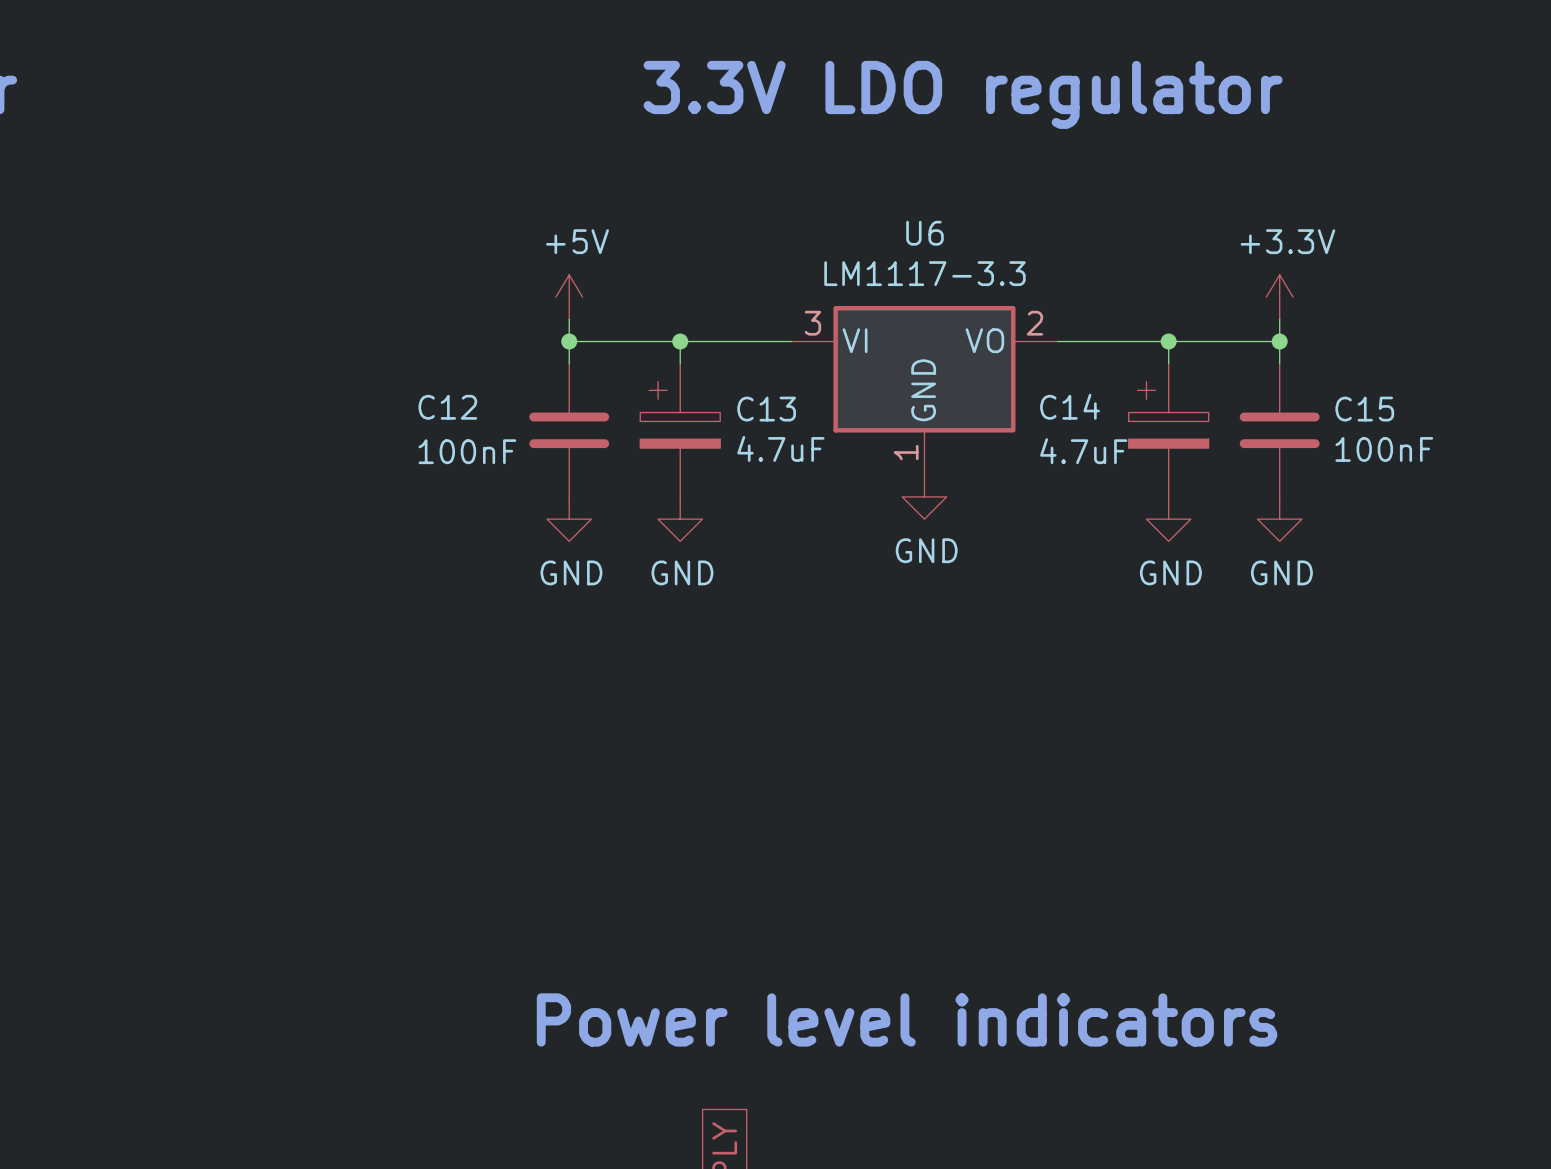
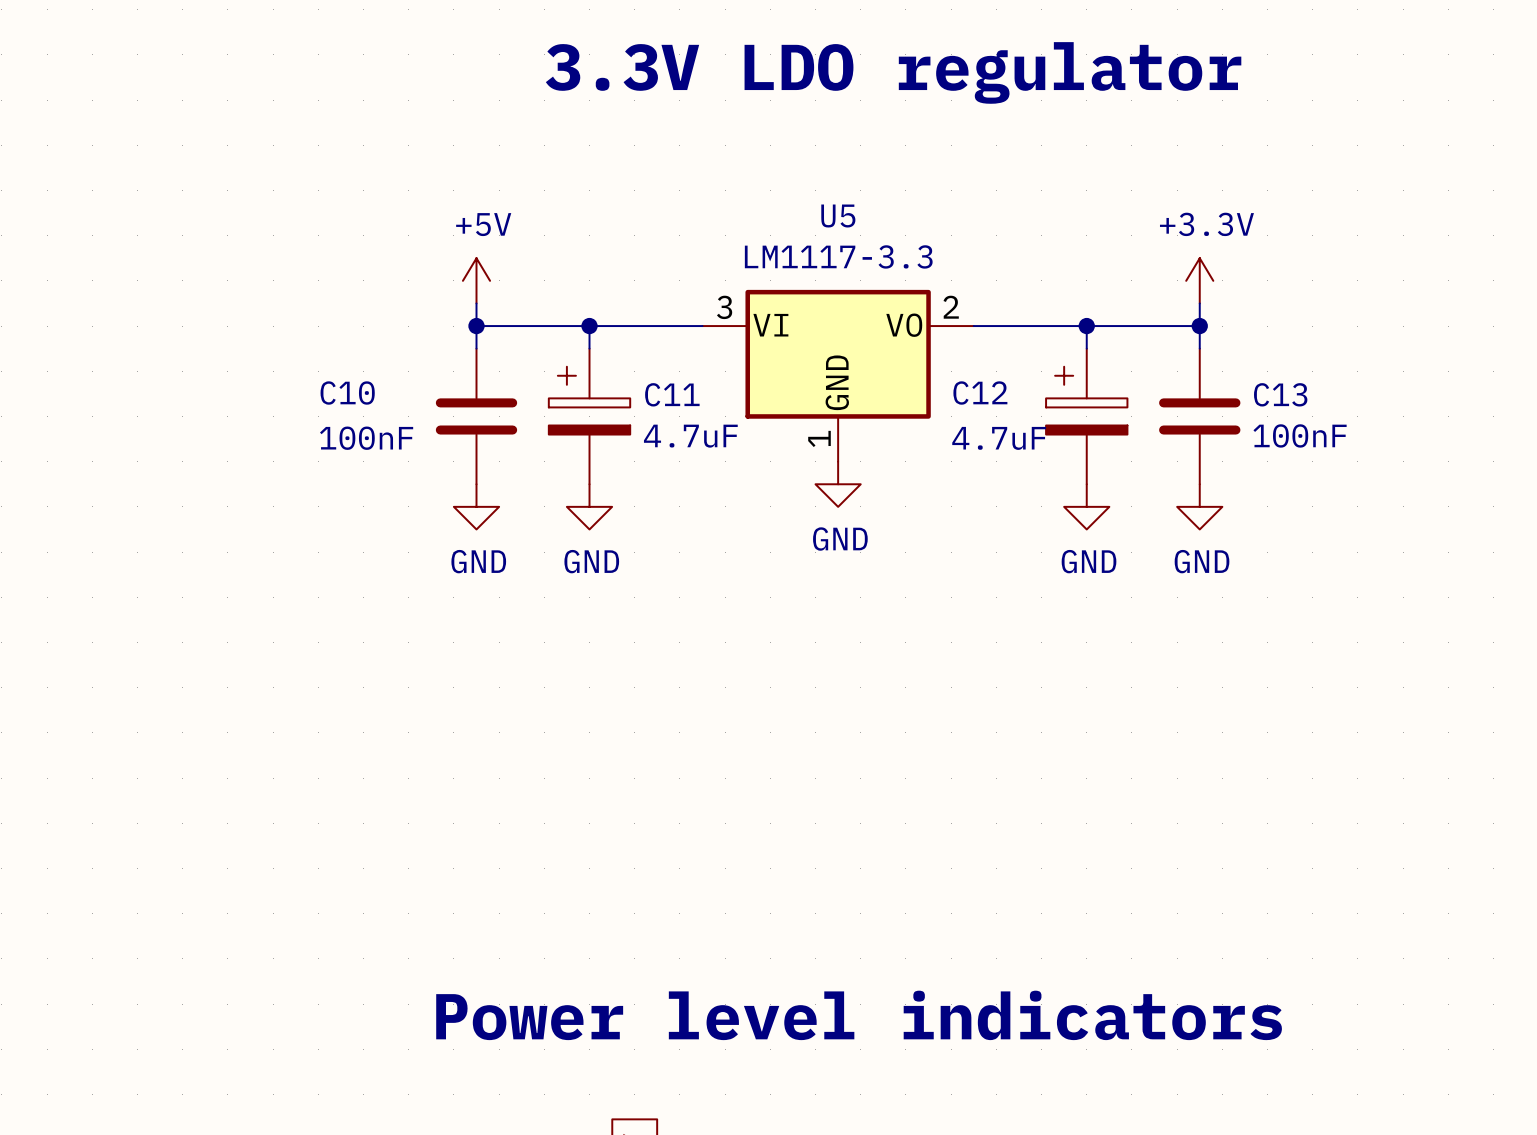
U6 name: U6 (924, 233) -> U5 (838, 216)
C14 name: C14 (1070, 406) -> C12 (980, 393)
C12 name: C12 (447, 407) -> C10 (347, 393)
C13 name: C13 (766, 409) -> C11 (672, 394)
C15 name: C15 (1364, 409) -> C13 (1280, 394)

